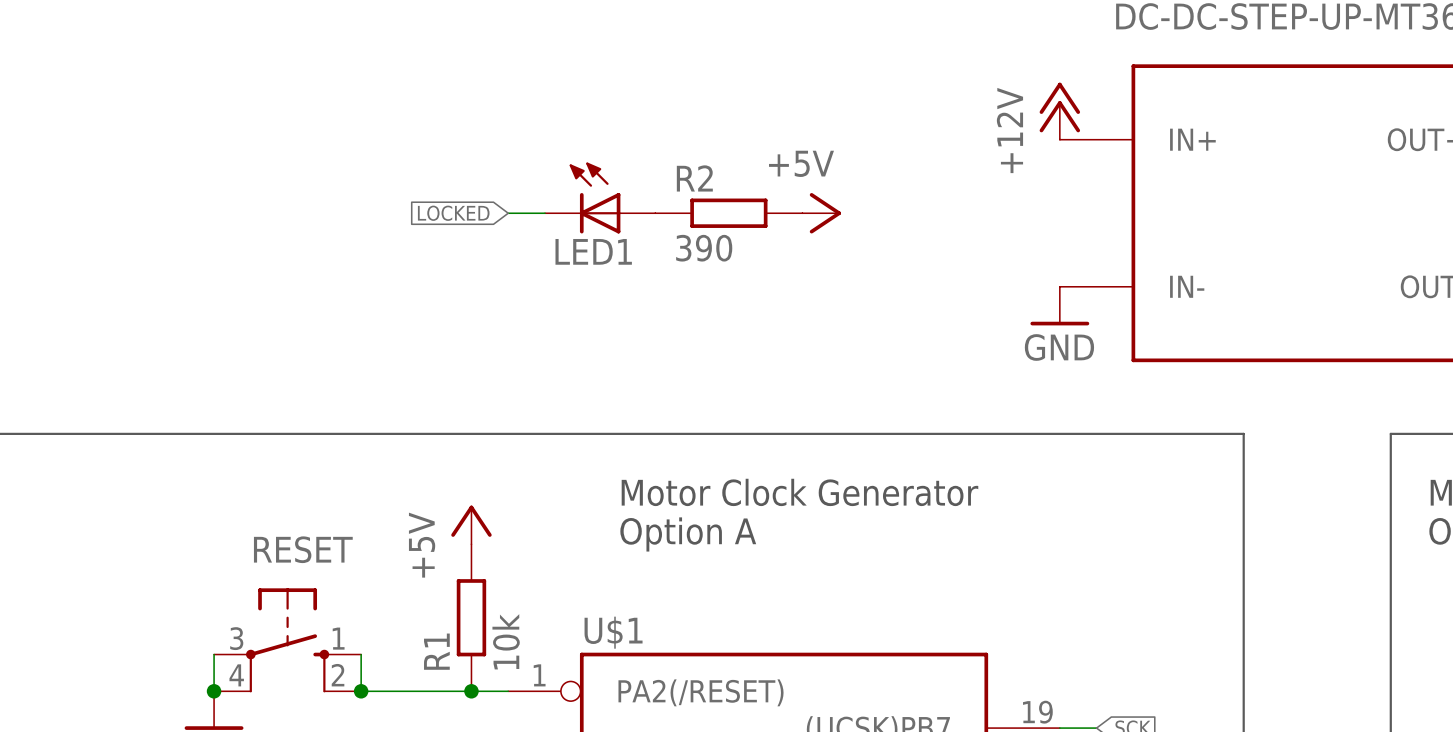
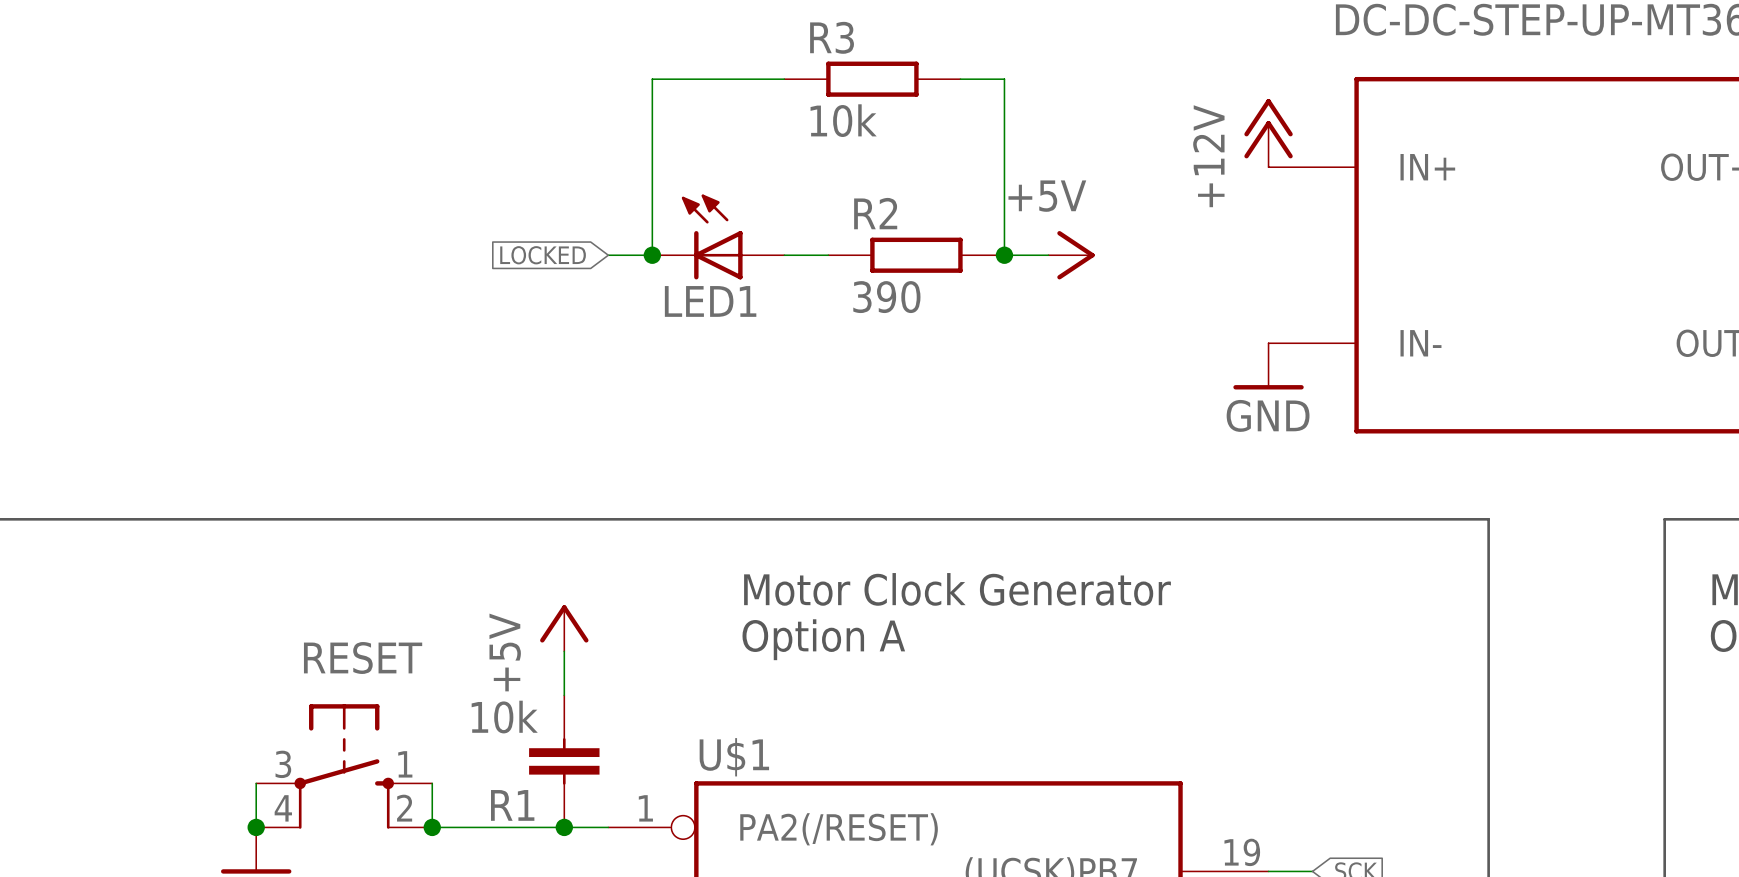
wire: none -> (784, 79) (652, 79) (652, 255)
R3: none -> 10k (872, 79)
wire: none -> (960, 79) (1004, 79) (1004, 255) (1048, 255)
junction: none -> (652, 255)
R2 position: (728, 213) -> (916, 255)
power symbol position: +5V (821, 213) -> +5V (1071, 255)
junction: none -> (1004, 255)
R1 symbol: [456, 544, 487, 692] -> [529, 695, 600, 828]
R1 value position: 10k (506, 641) -> 10k (504, 717)

